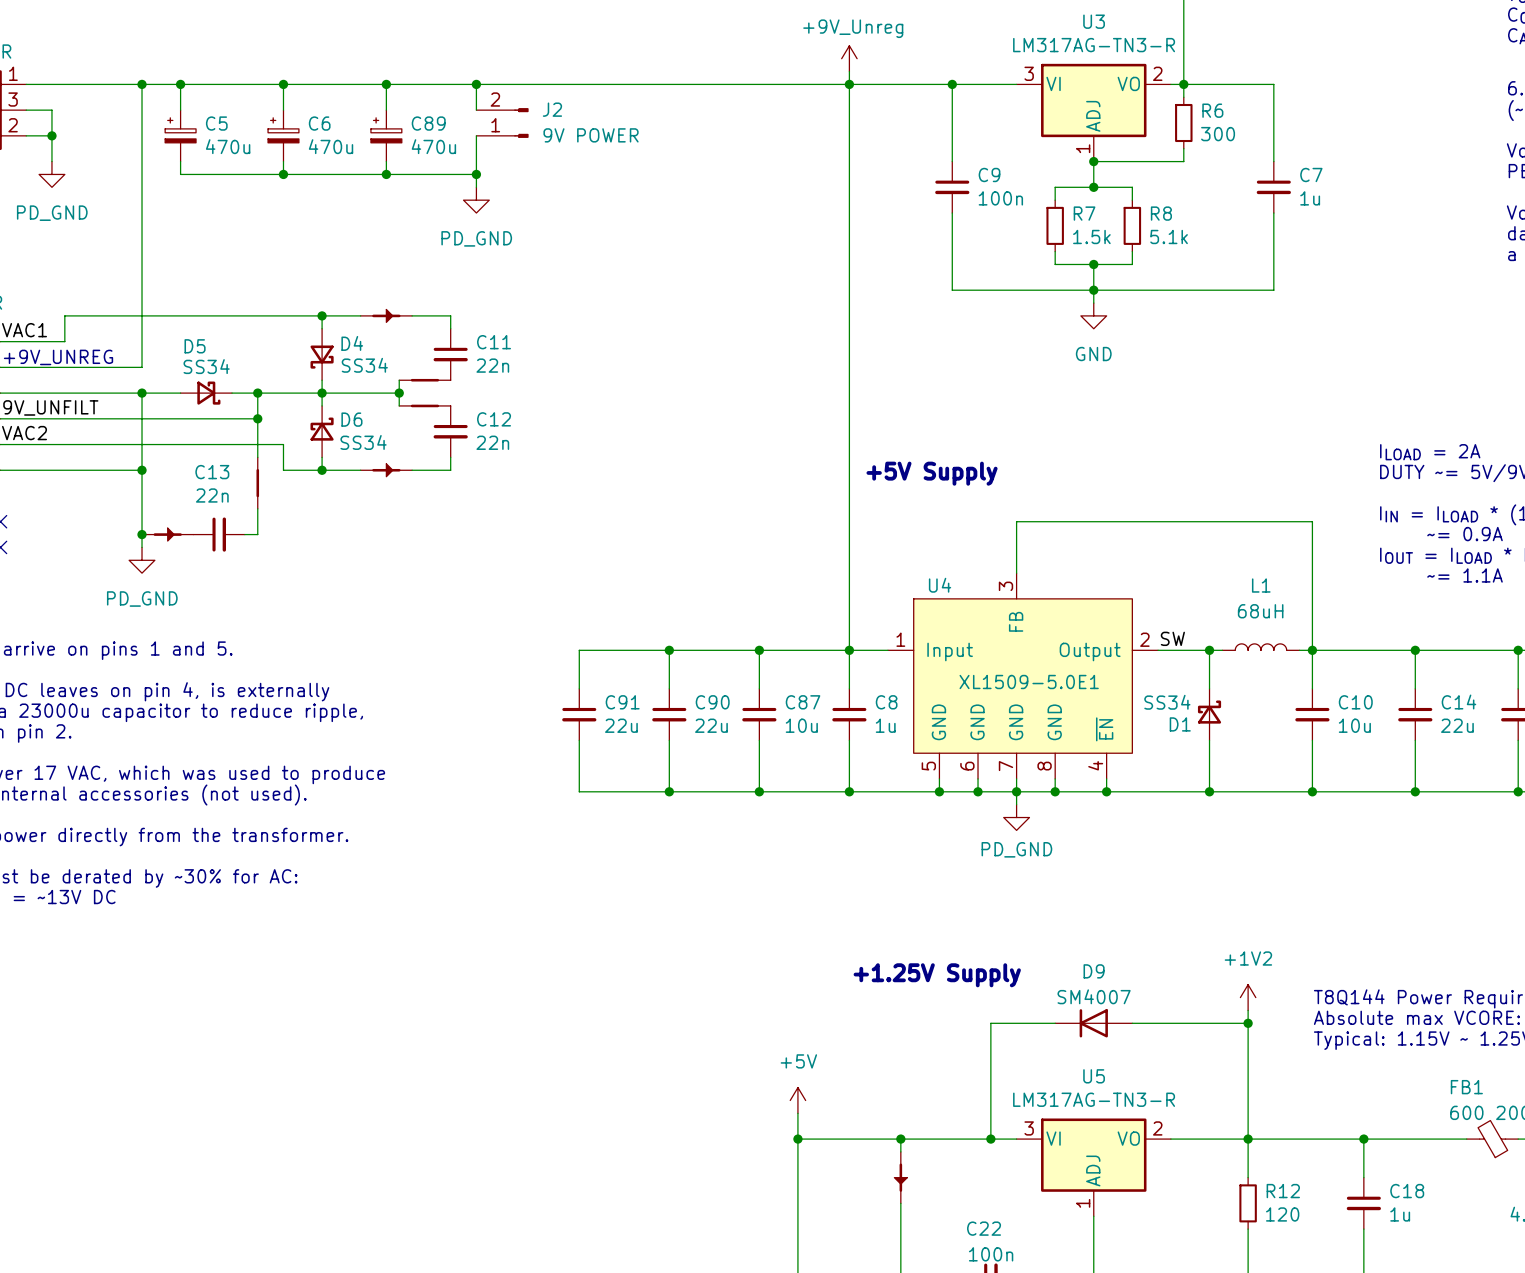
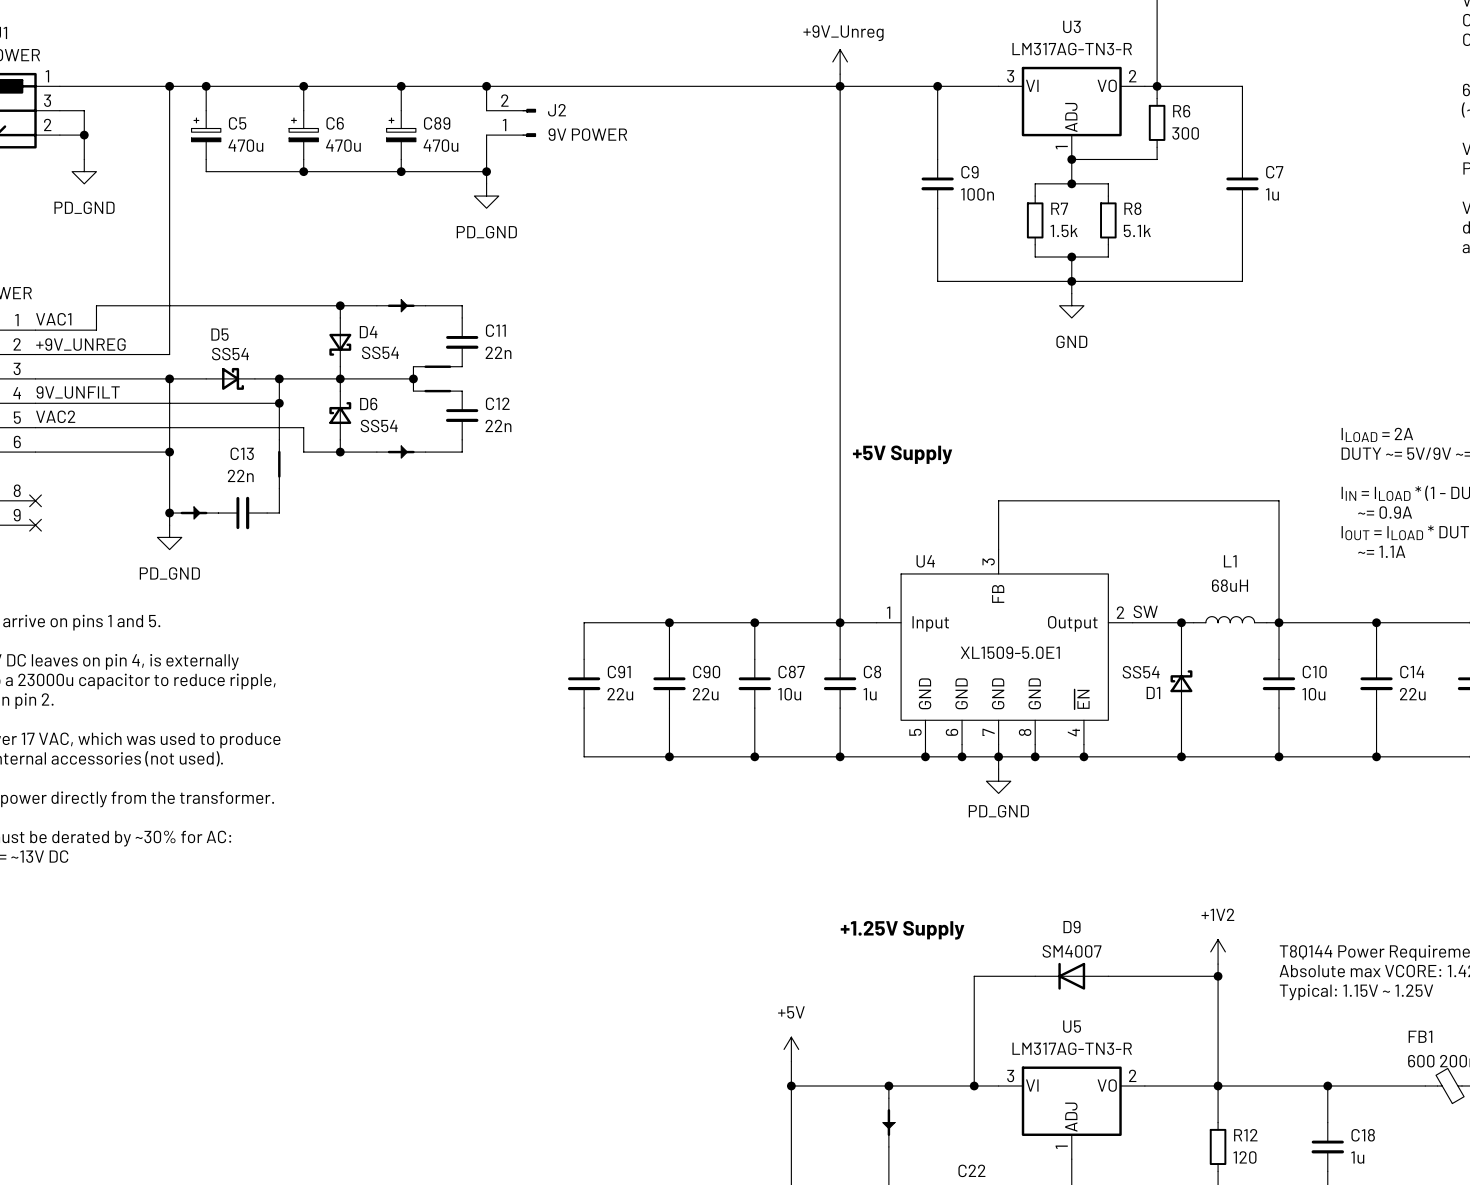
D4 value: SS34 (364, 365) -> SS54 (380, 352)
D5 value: SS34 (206, 366) -> SS54 (230, 354)
D6 value: SS34 (363, 442) -> SS54 (379, 426)
D1 value: SS34 (1167, 702) -> SS54 (1141, 672)

